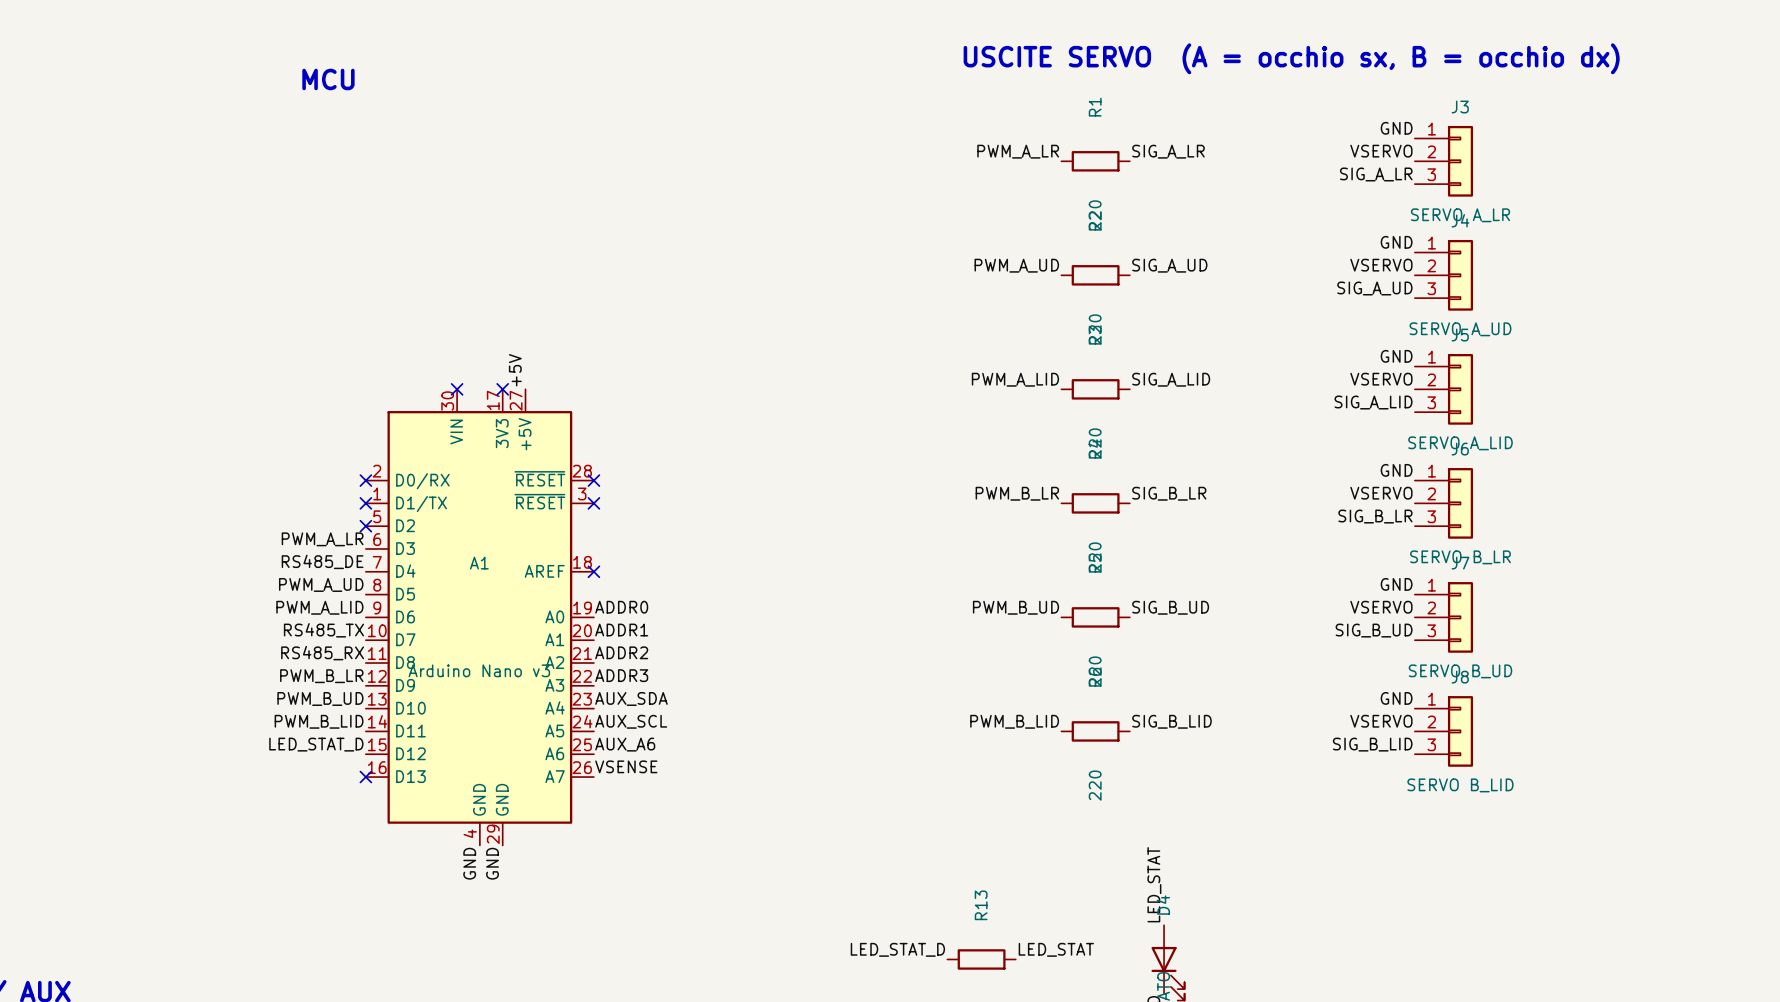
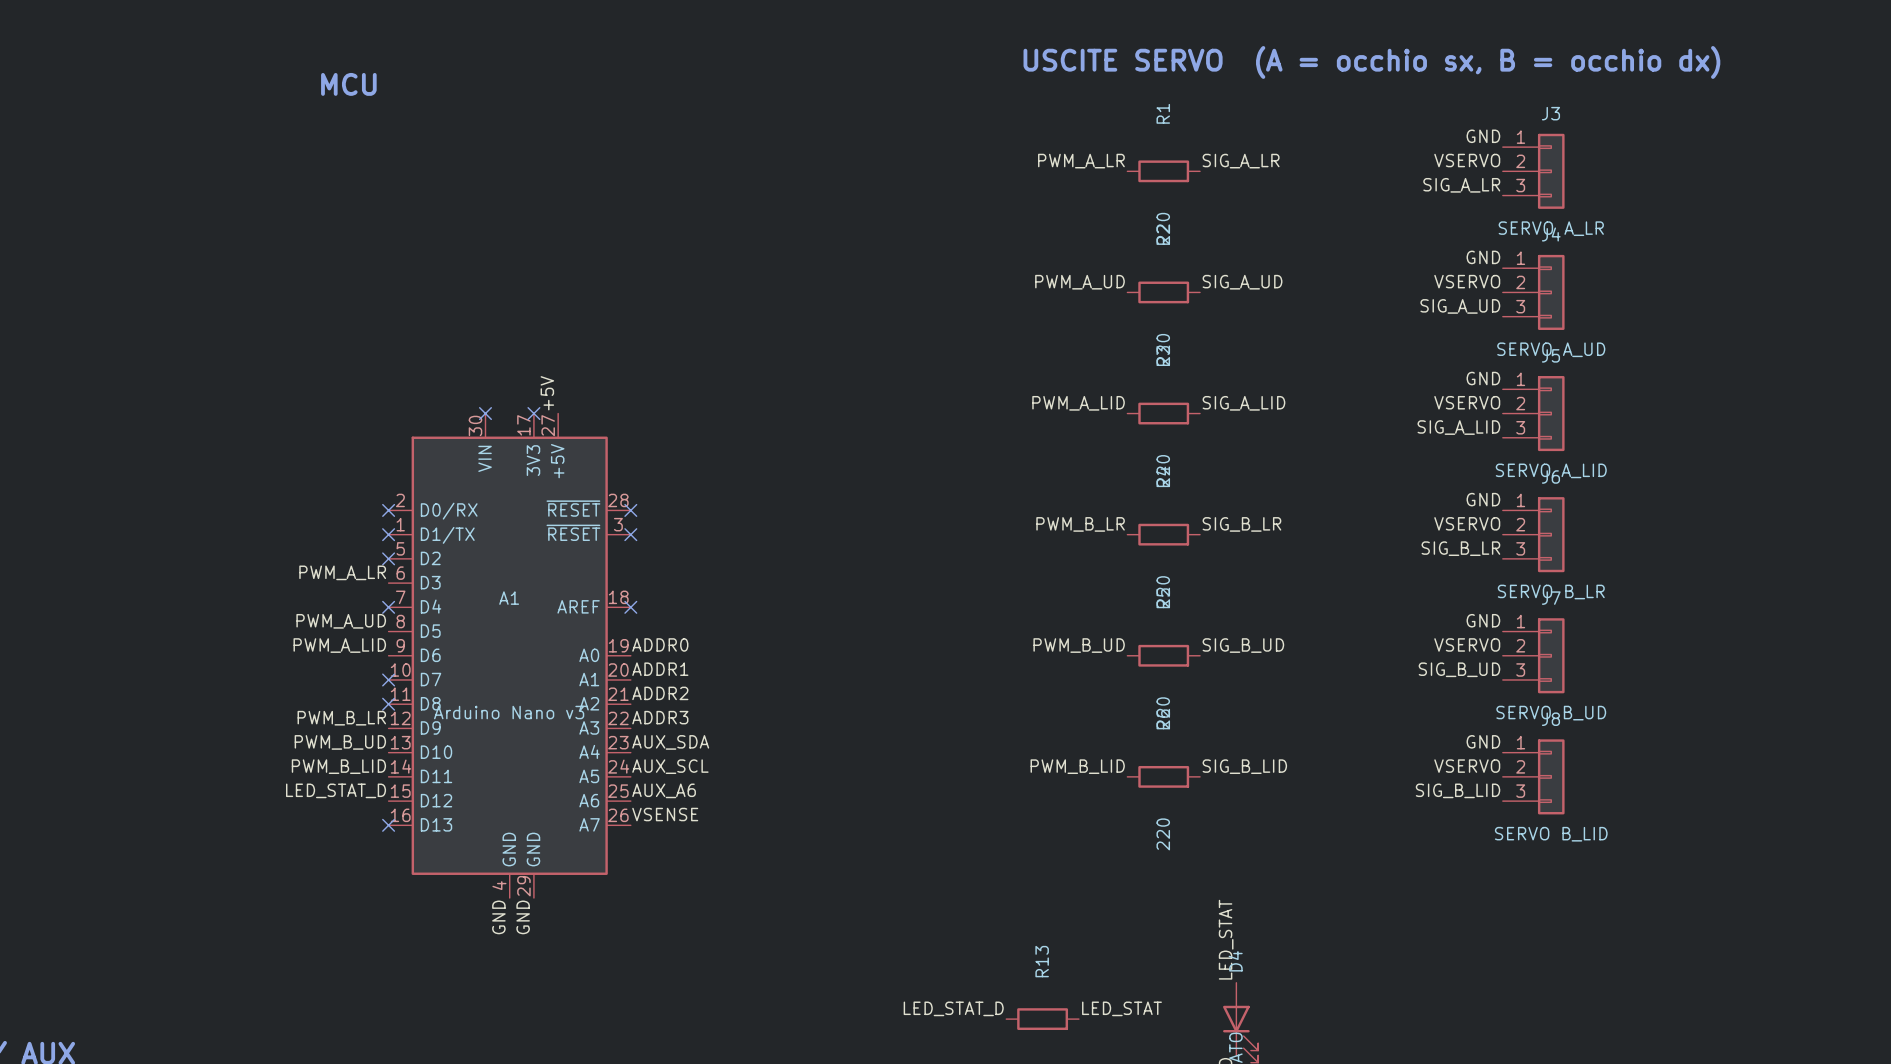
label: RS485_DE (322, 561) -> none
no-connect mark: none -> (388, 607)
label: RS485_TX (323, 630) -> none
no-connect mark: none -> (388, 679)
label: RS485_RX (322, 653) -> none
no-connect mark: none -> (388, 704)

